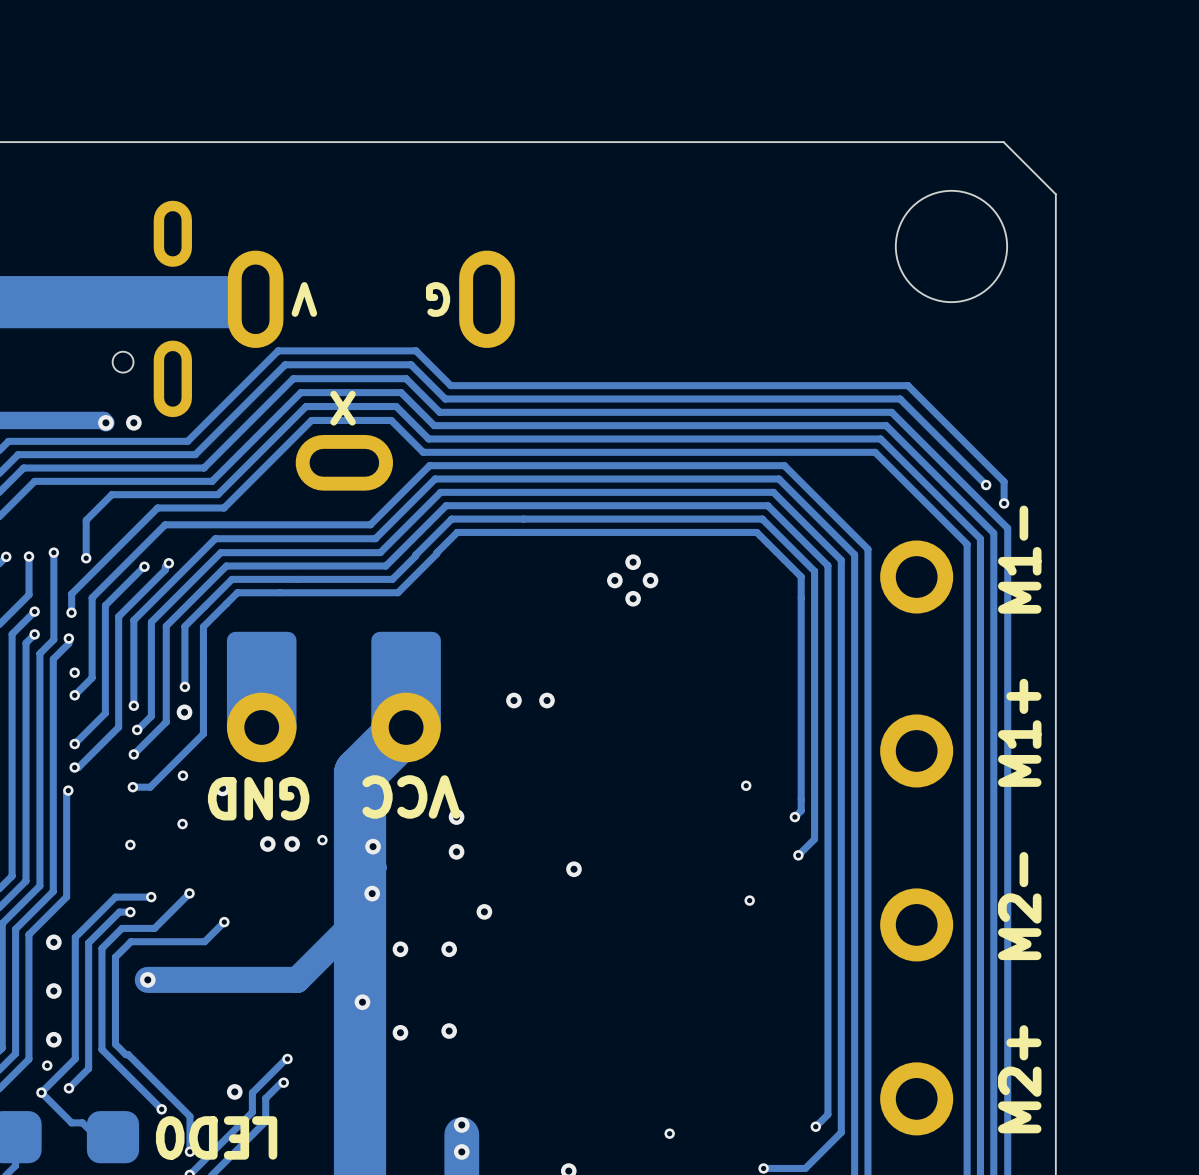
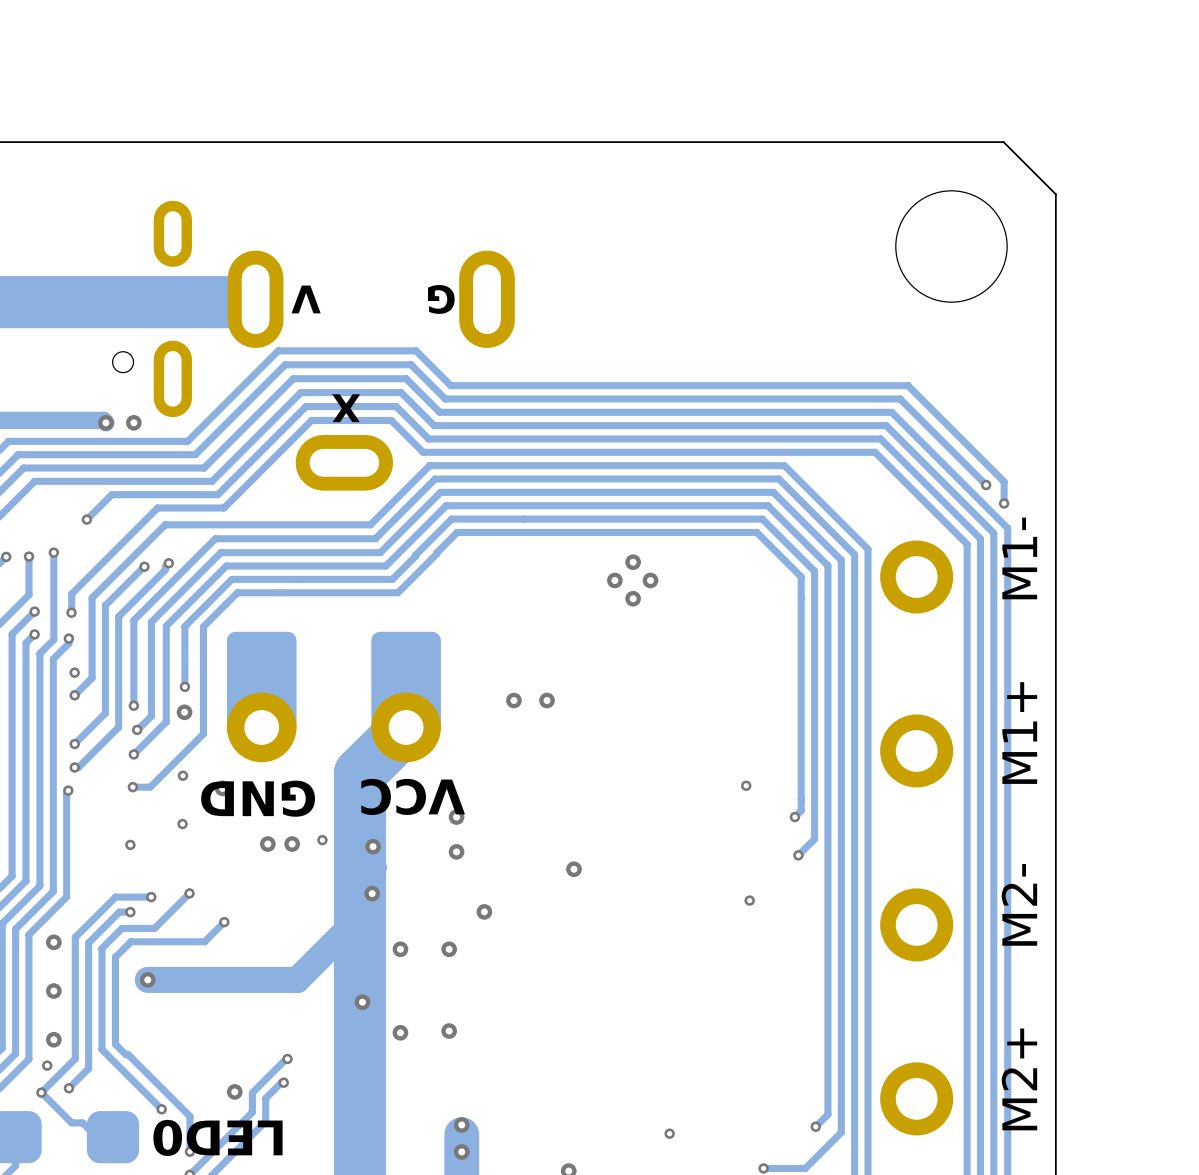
track: (86, 519) (86, 558) -> none
via position: (86, 558) -> (86, 519)

